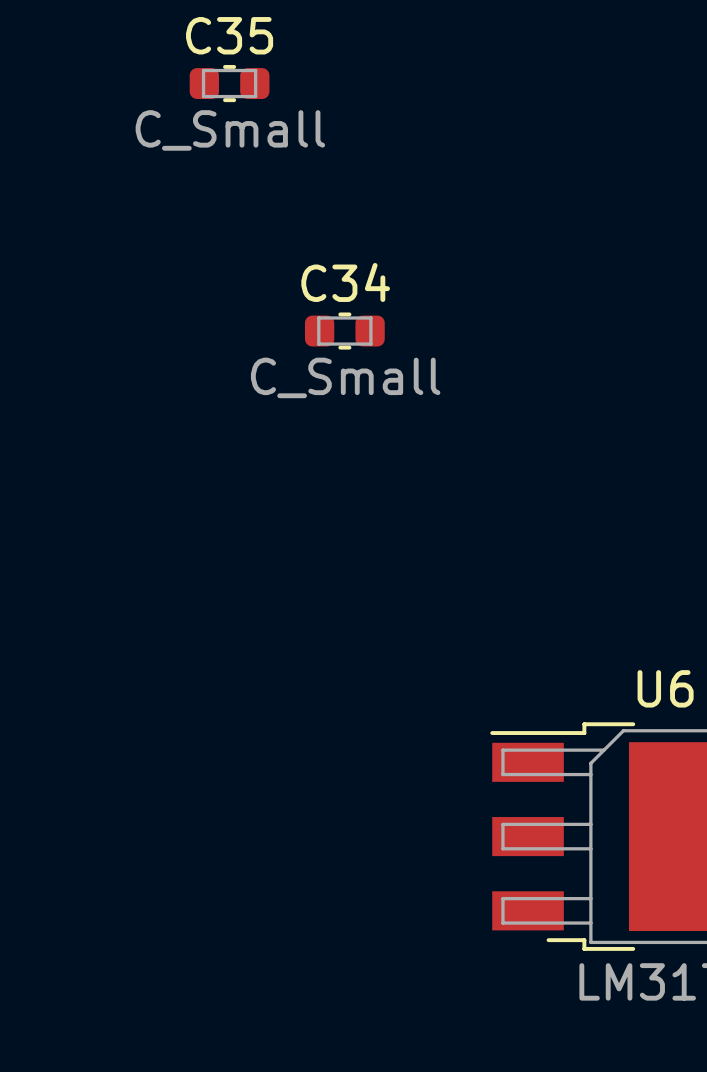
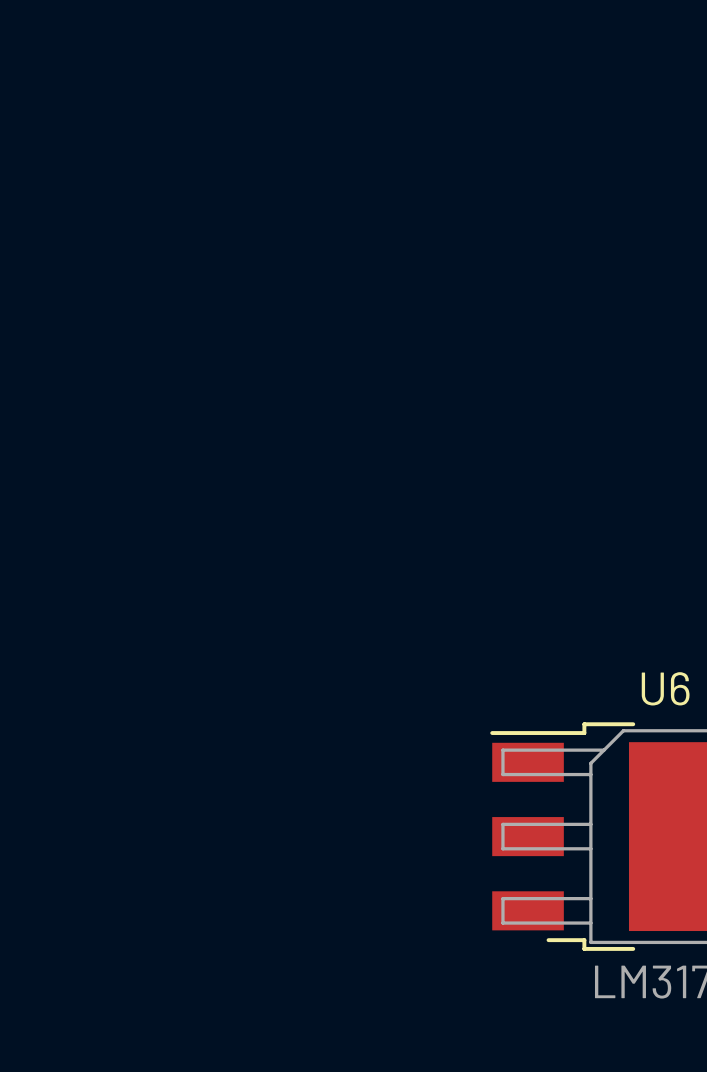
C35: C_Small (229, 83) -> none
C34: C_Small (344, 331) -> none

